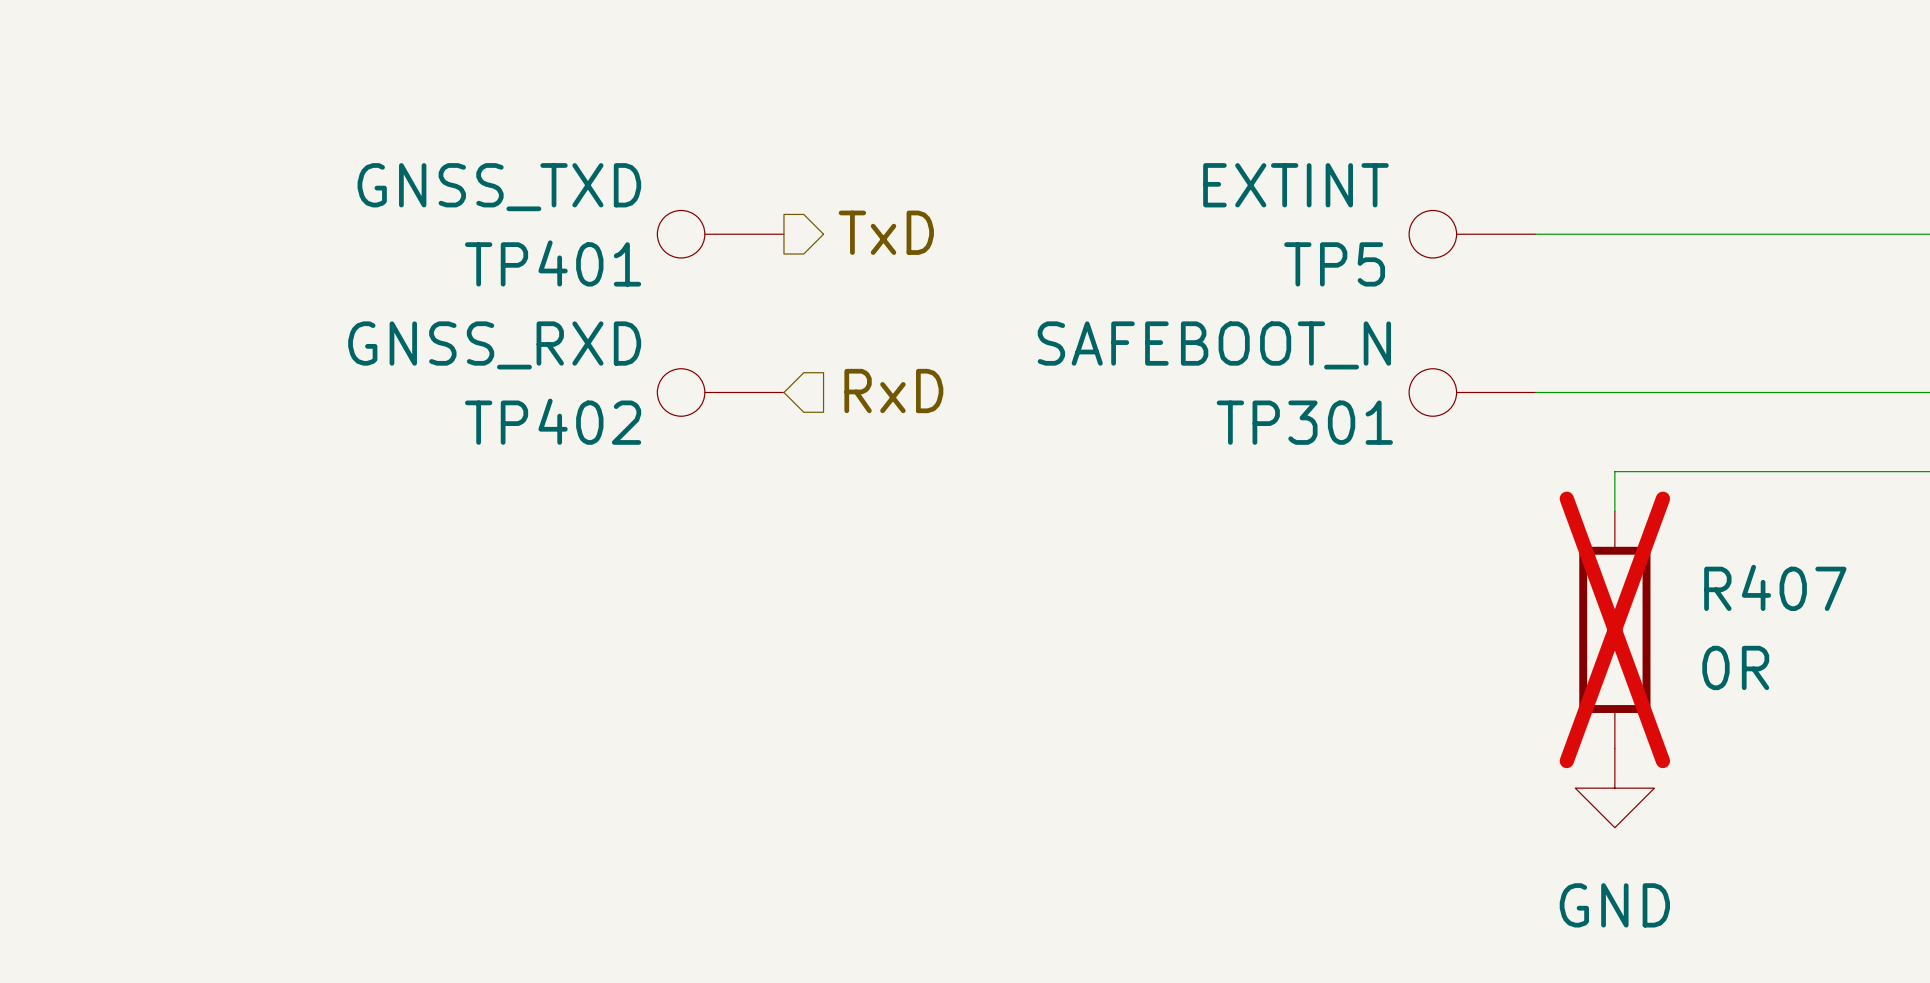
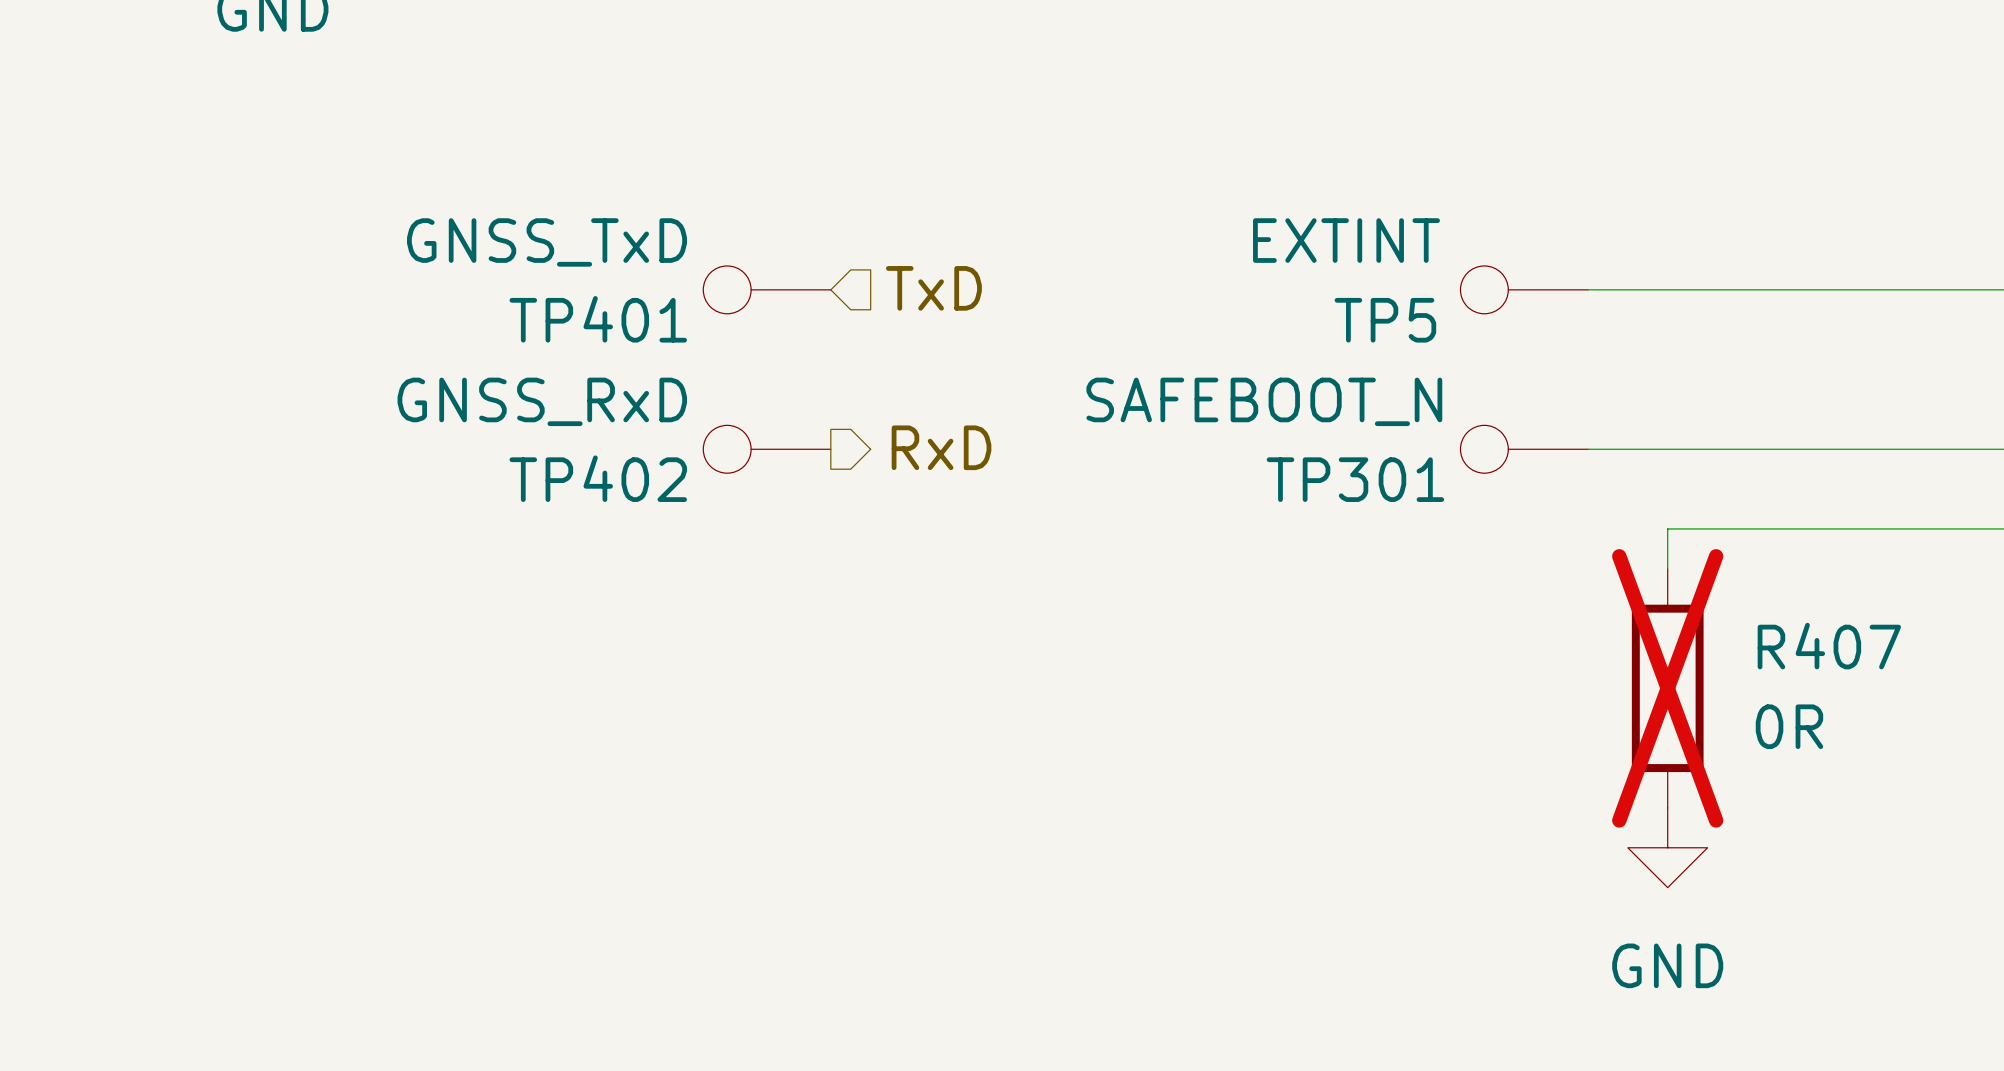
TP401 value: GNSS_TXD (499, 187) -> GNSS_TxD (547, 242)
hierarchical label shape: output (886, 232) -> input (933, 288)
TP402 value: GNSS_RXD (494, 345) -> GNSS_RxD (542, 401)
hierarchical label shape: input (893, 391) -> output (941, 447)

